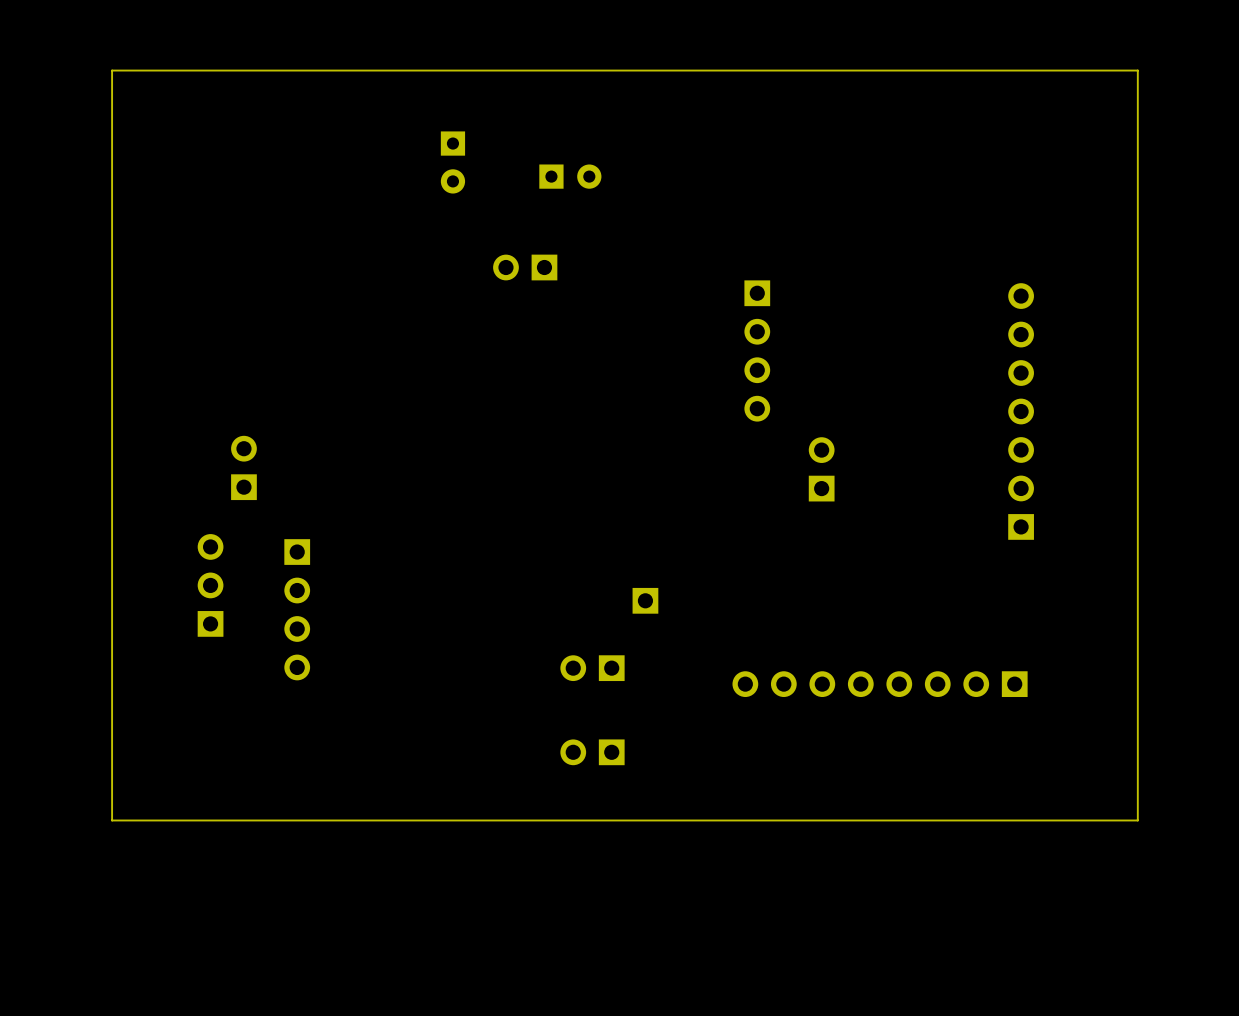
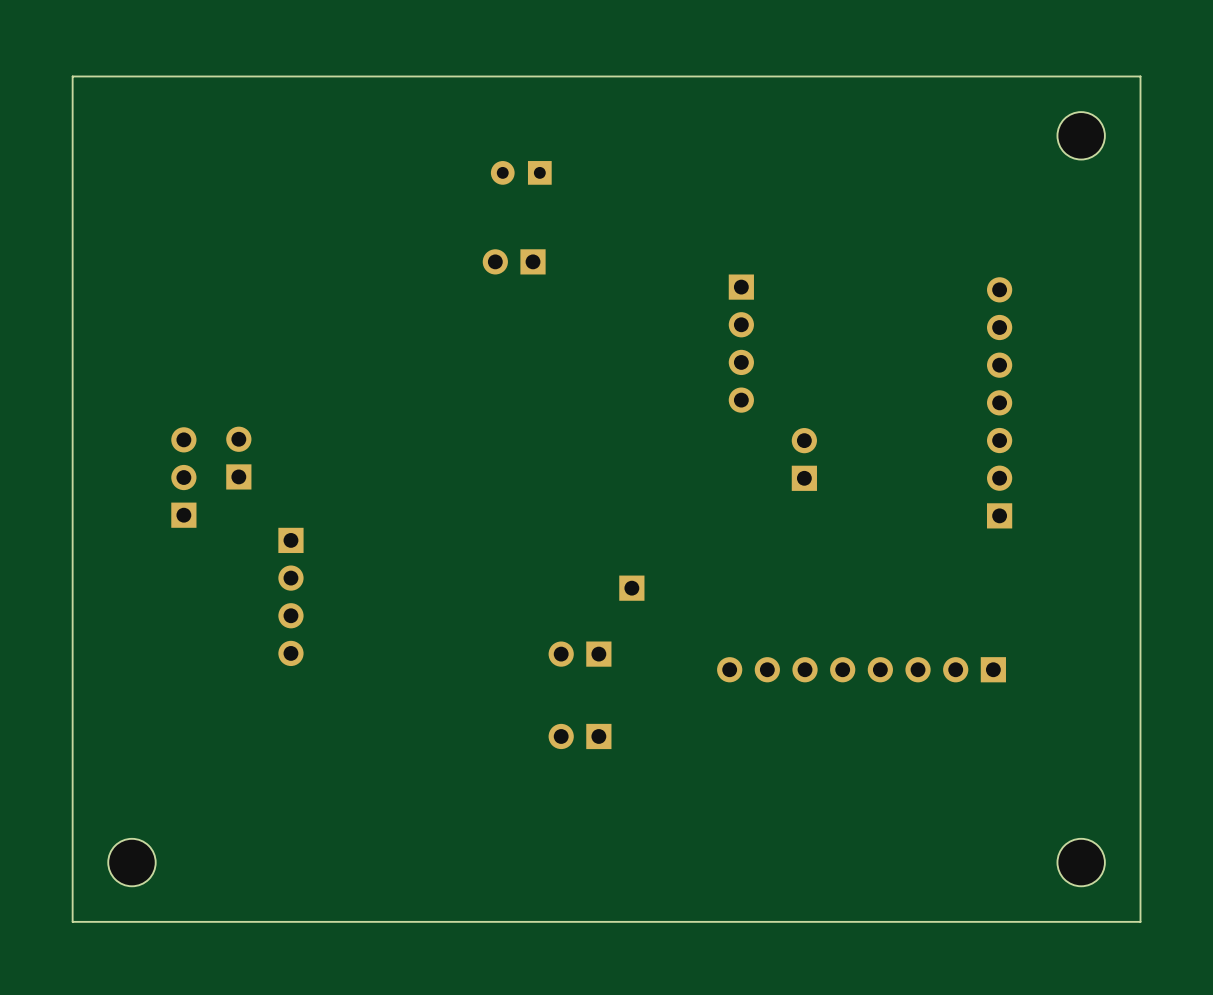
board edge: (1137, 70) (112, 70) (112, 820) (1137, 820) (1137, 70) -> (1140, 76) (1140, 921) (72, 921) (72, 76) (1140, 76)
part: none -> (1081, 135)
part: (452, 162) -> none
part rotation: 0° (570, 176) -> 180° (521, 172)
part position: (570, 176) -> (521, 172)
part position: (210, 585) -> (183, 477)
part: none -> (131, 862)
part: none -> (1081, 862)

